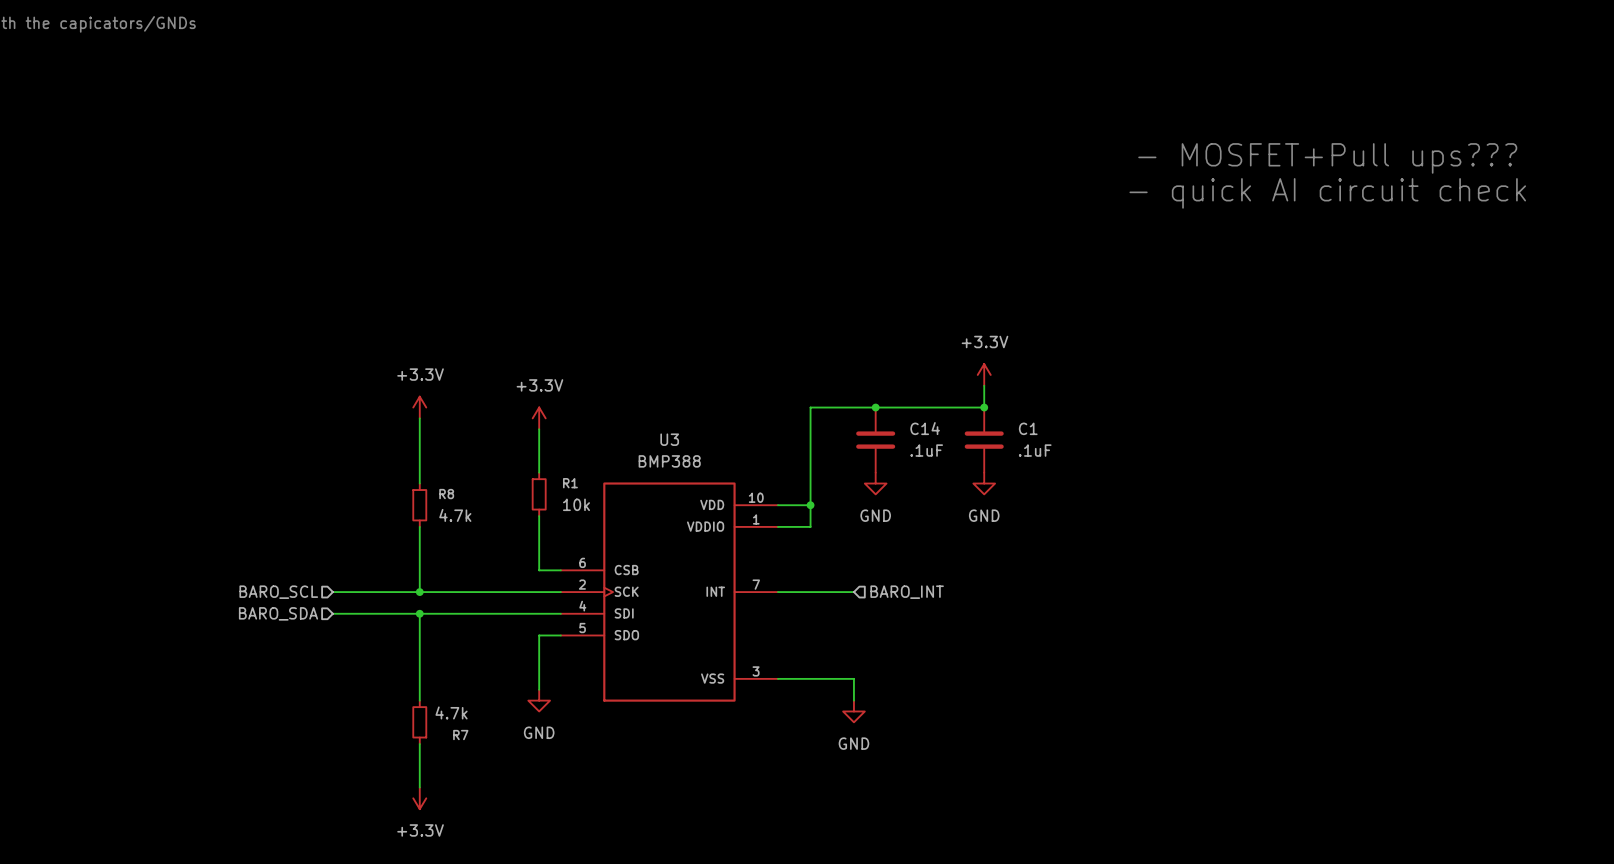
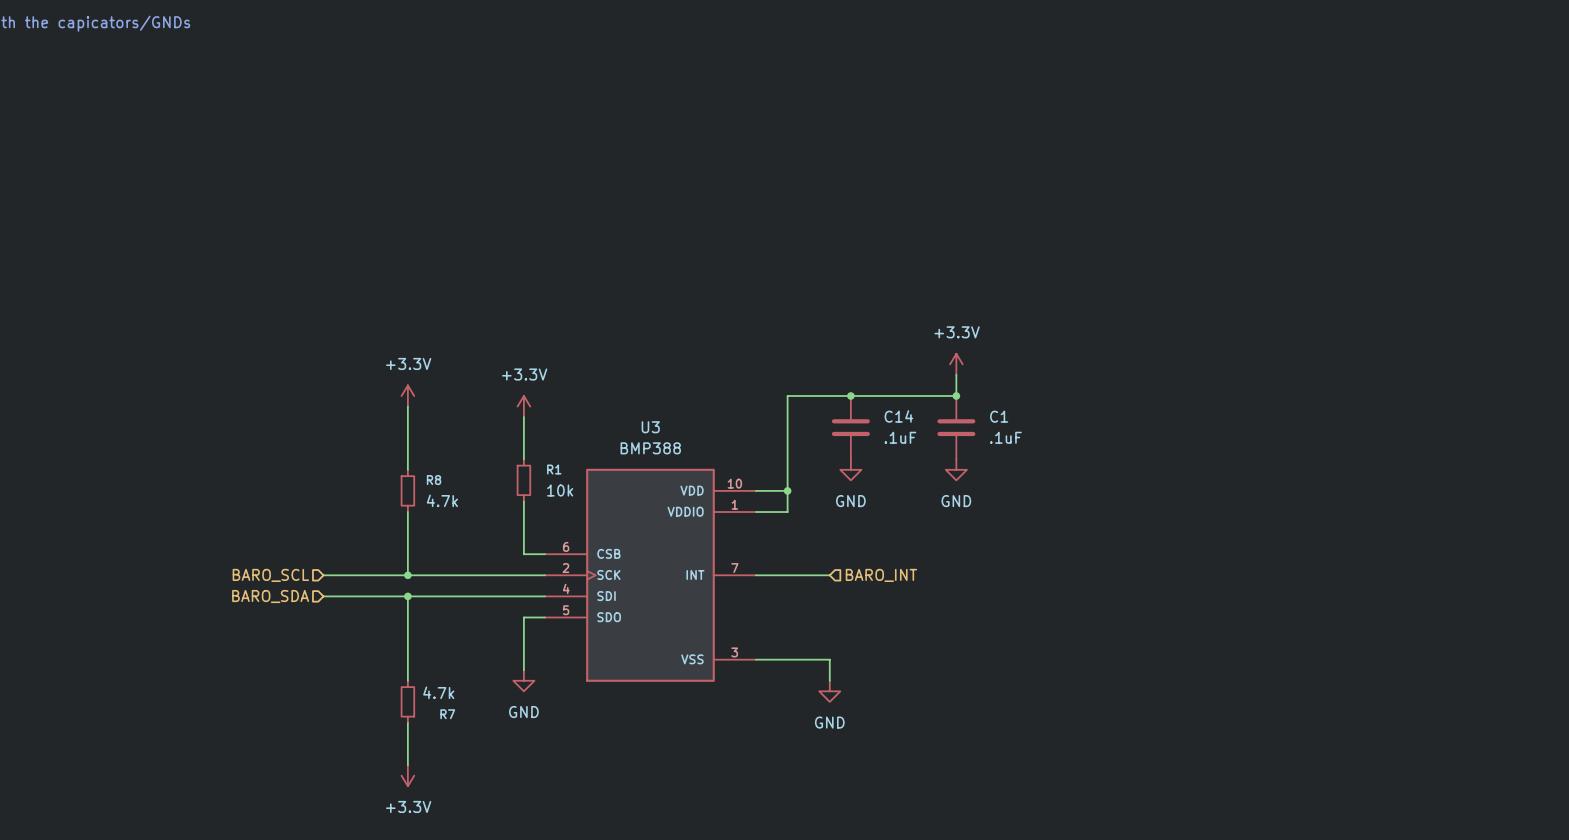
text: - MOSFET+Pull ups??? (1327, 158) -> none
text: - quick AI circuit check (1327, 193) -> none

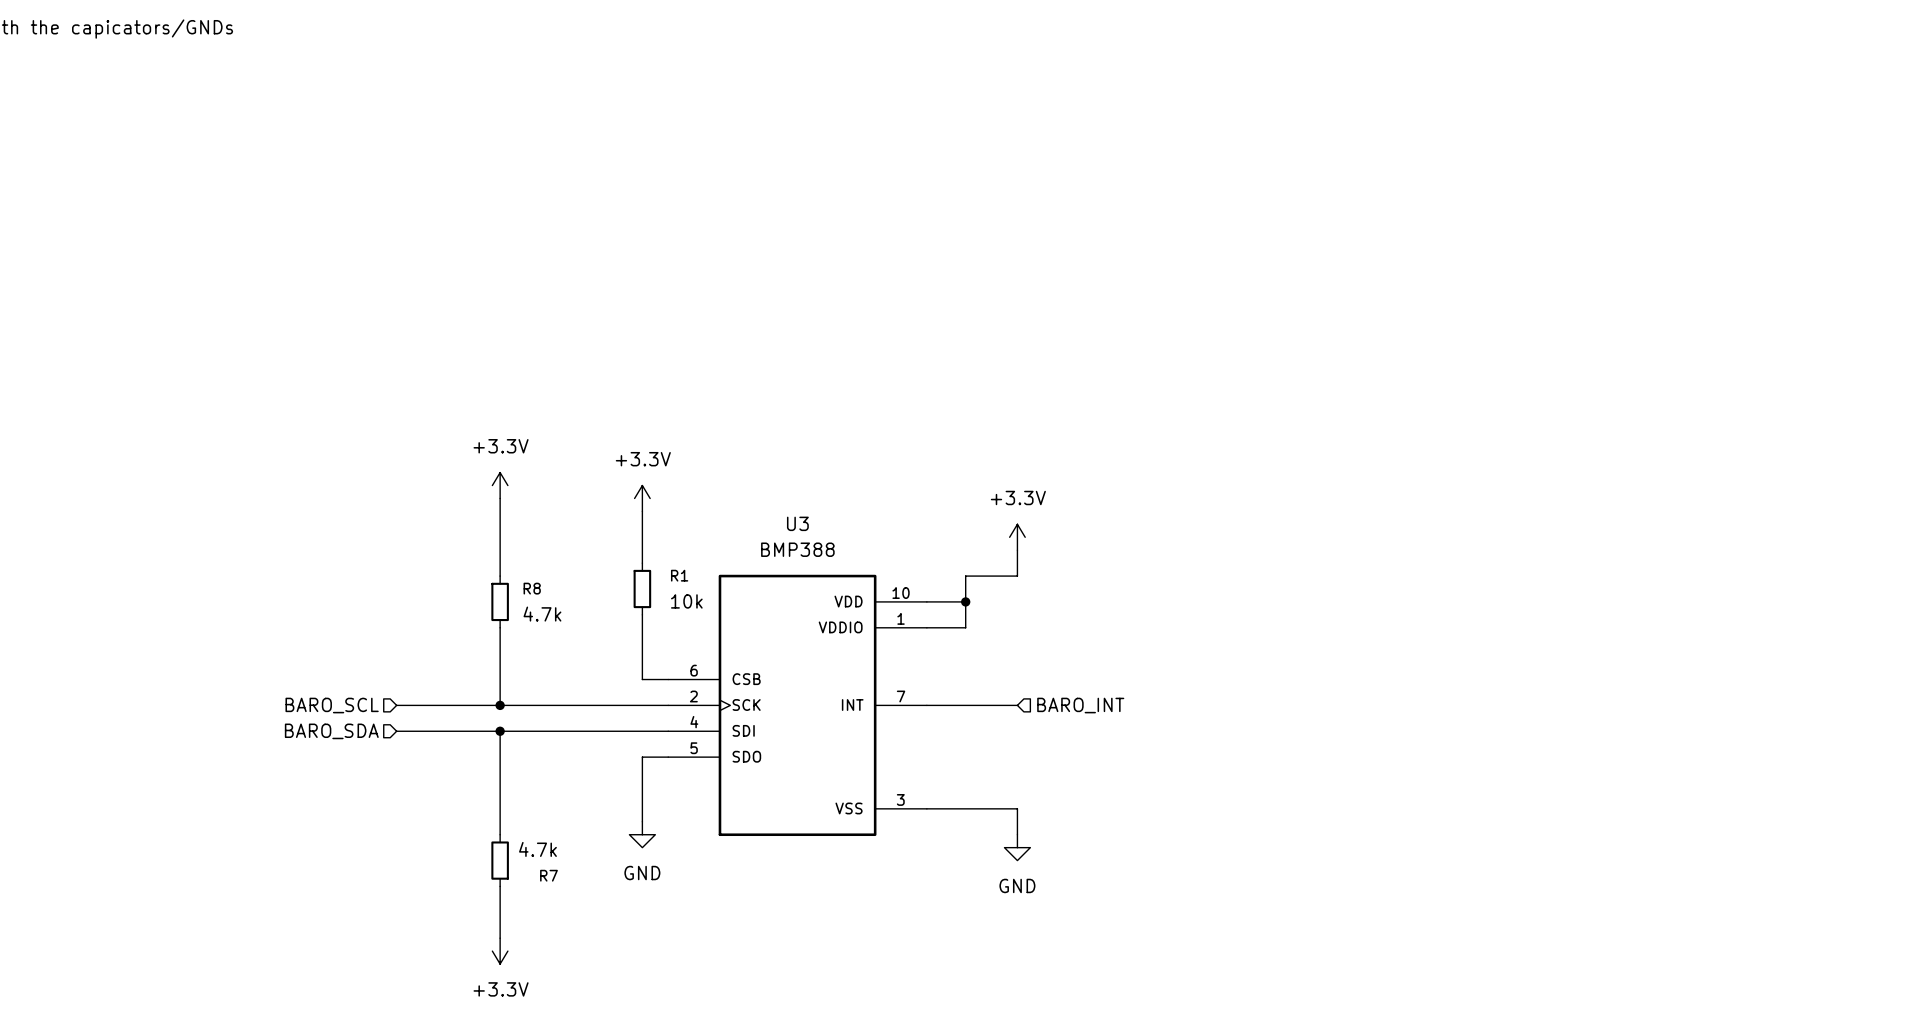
power symbol position: +3.3V (956, 364) -> +3.3V (1017, 537)
wire: (956, 374) (956, 395) (787, 395) (787, 469) -> (1017, 550) (1017, 576) (965, 576)
junction: (850, 395) -> none
junction: (956, 395) -> none
C14: .1uF (850, 427) -> none
C1: .1uF (956, 427) -> none
power symbol: GND (850, 469) -> none
power symbol: GND (956, 469) -> none

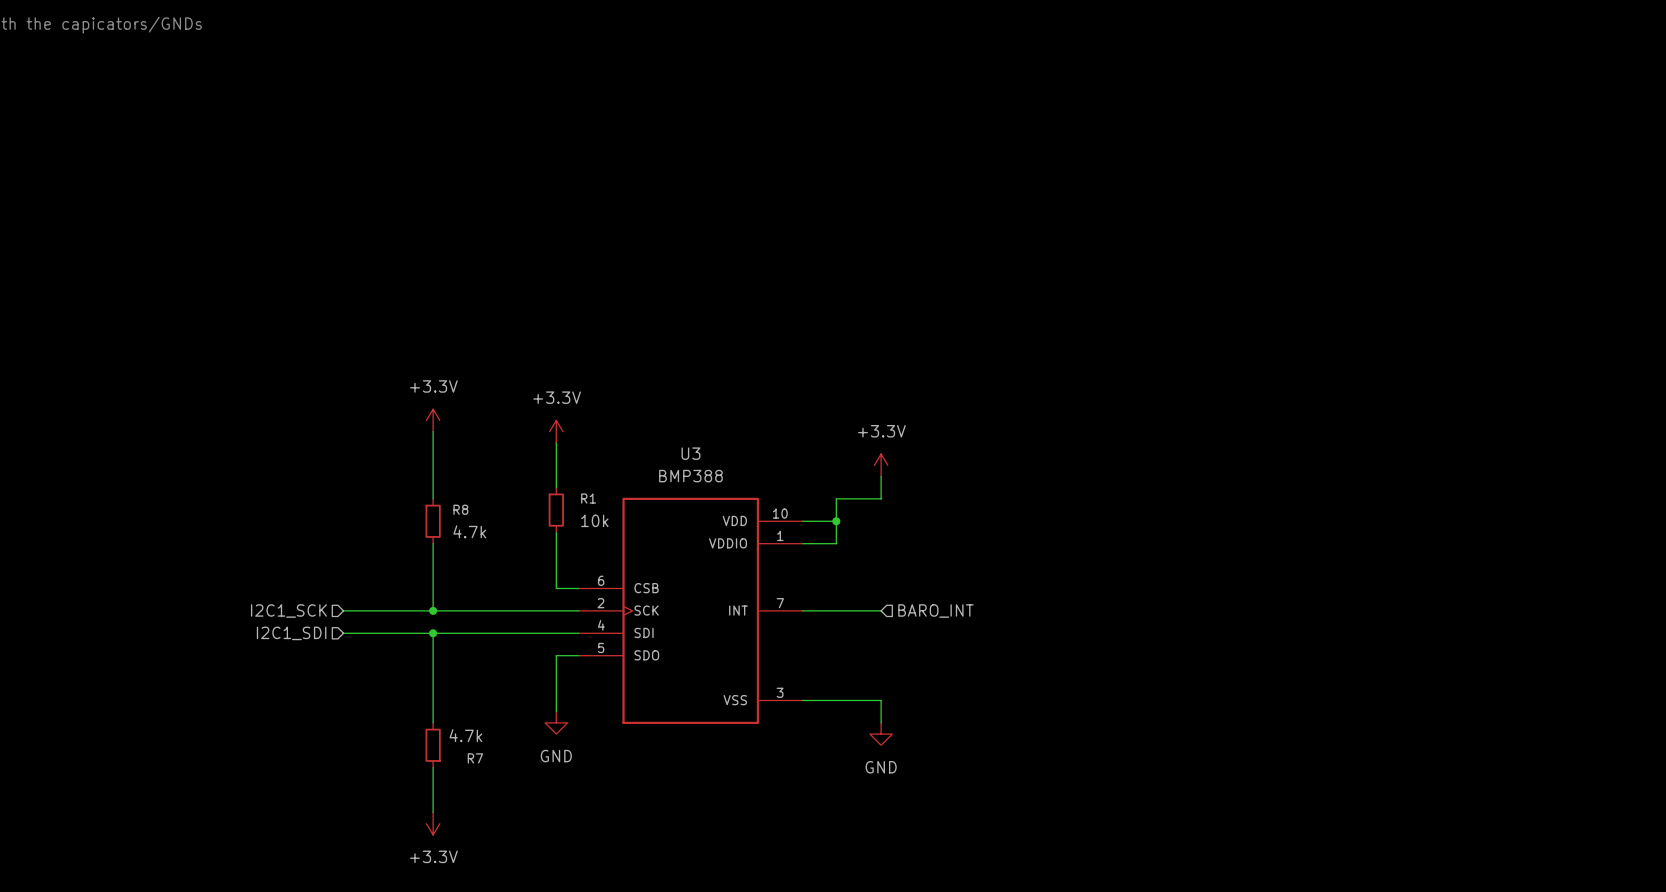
hierarchical label: BARO_SCL (332, 705) -> I2C1_SCK (288, 611)
hierarchical label: BARO_SDA (331, 731) -> I2C1_SDI (291, 633)

